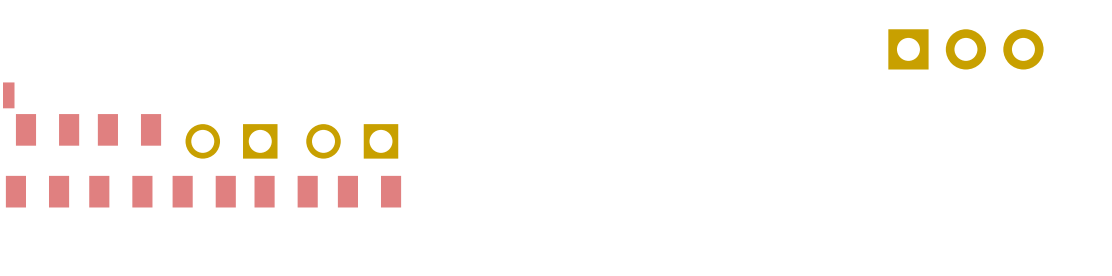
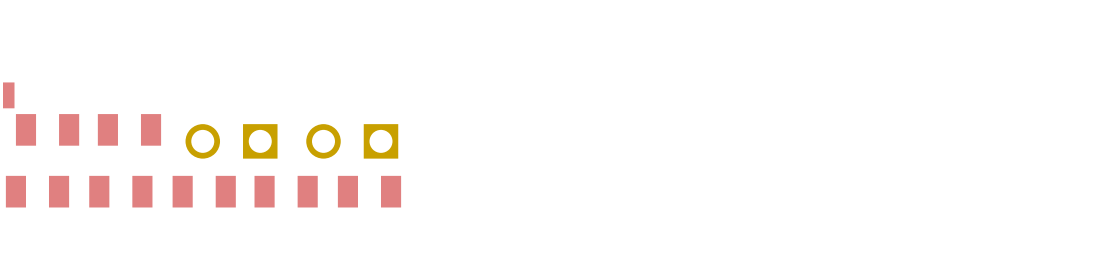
part: (965, 49) -> none

